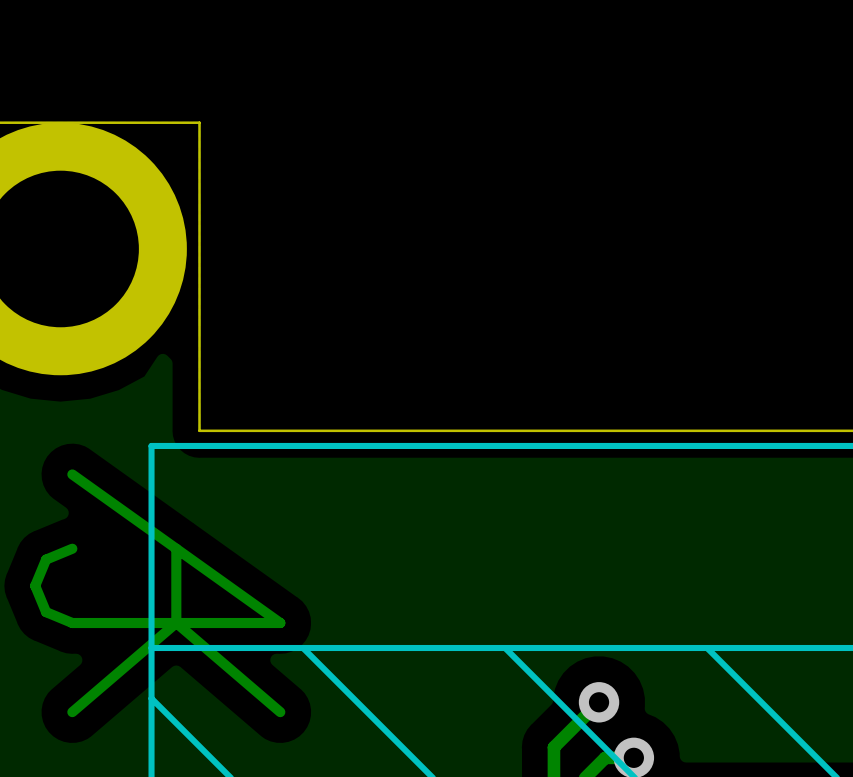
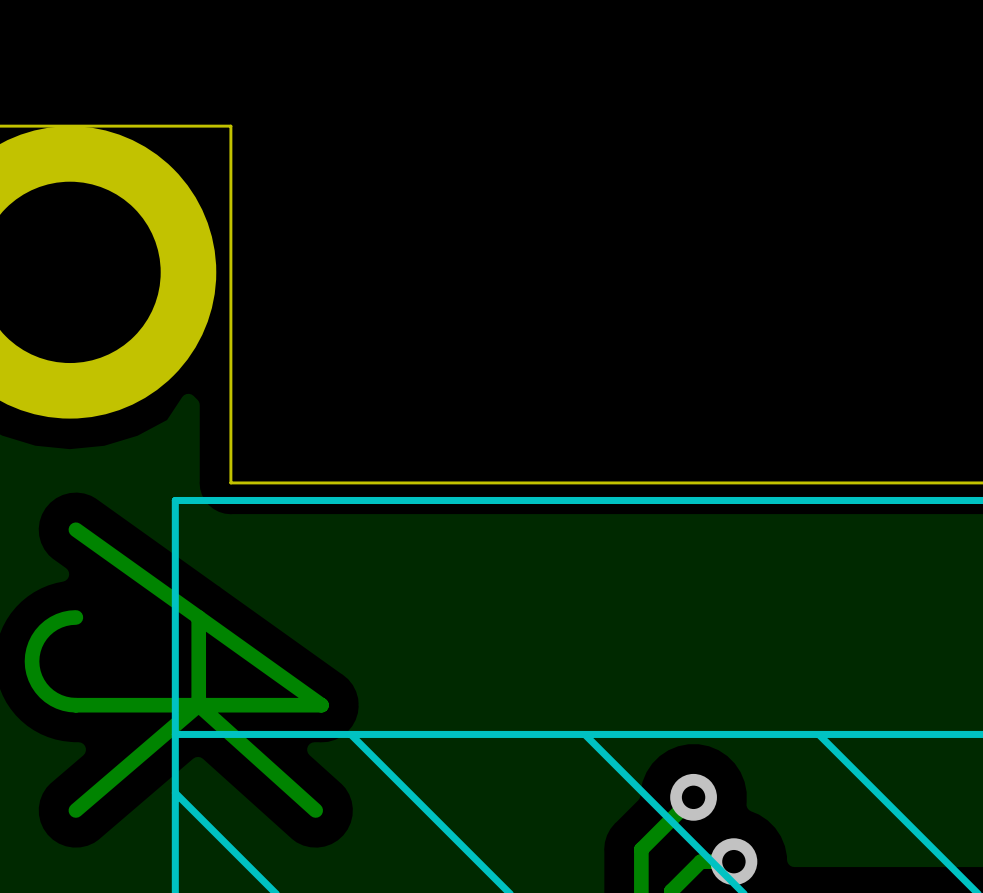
drawing shape: [30, 469, 286, 718] -> [24, 522, 329, 818]

